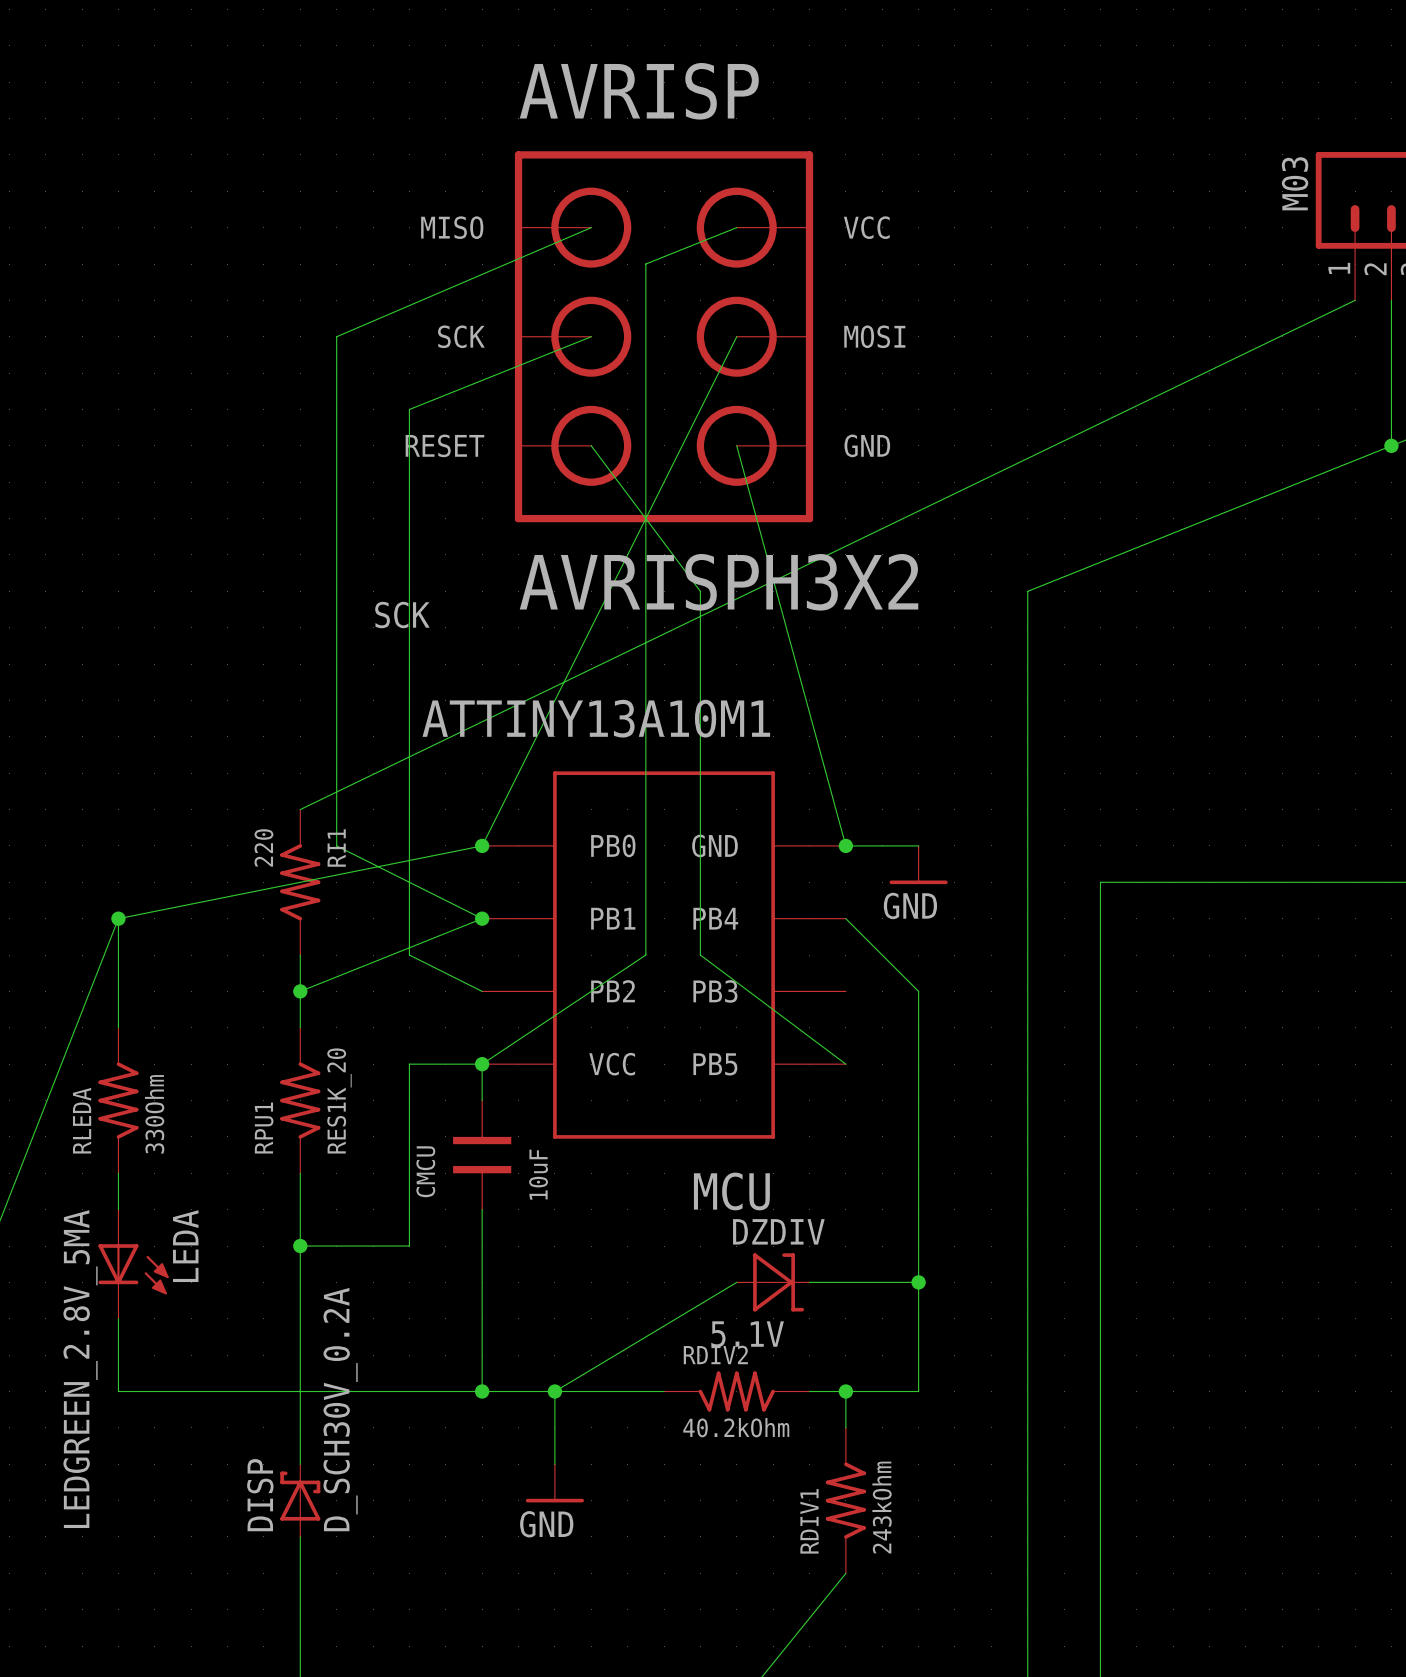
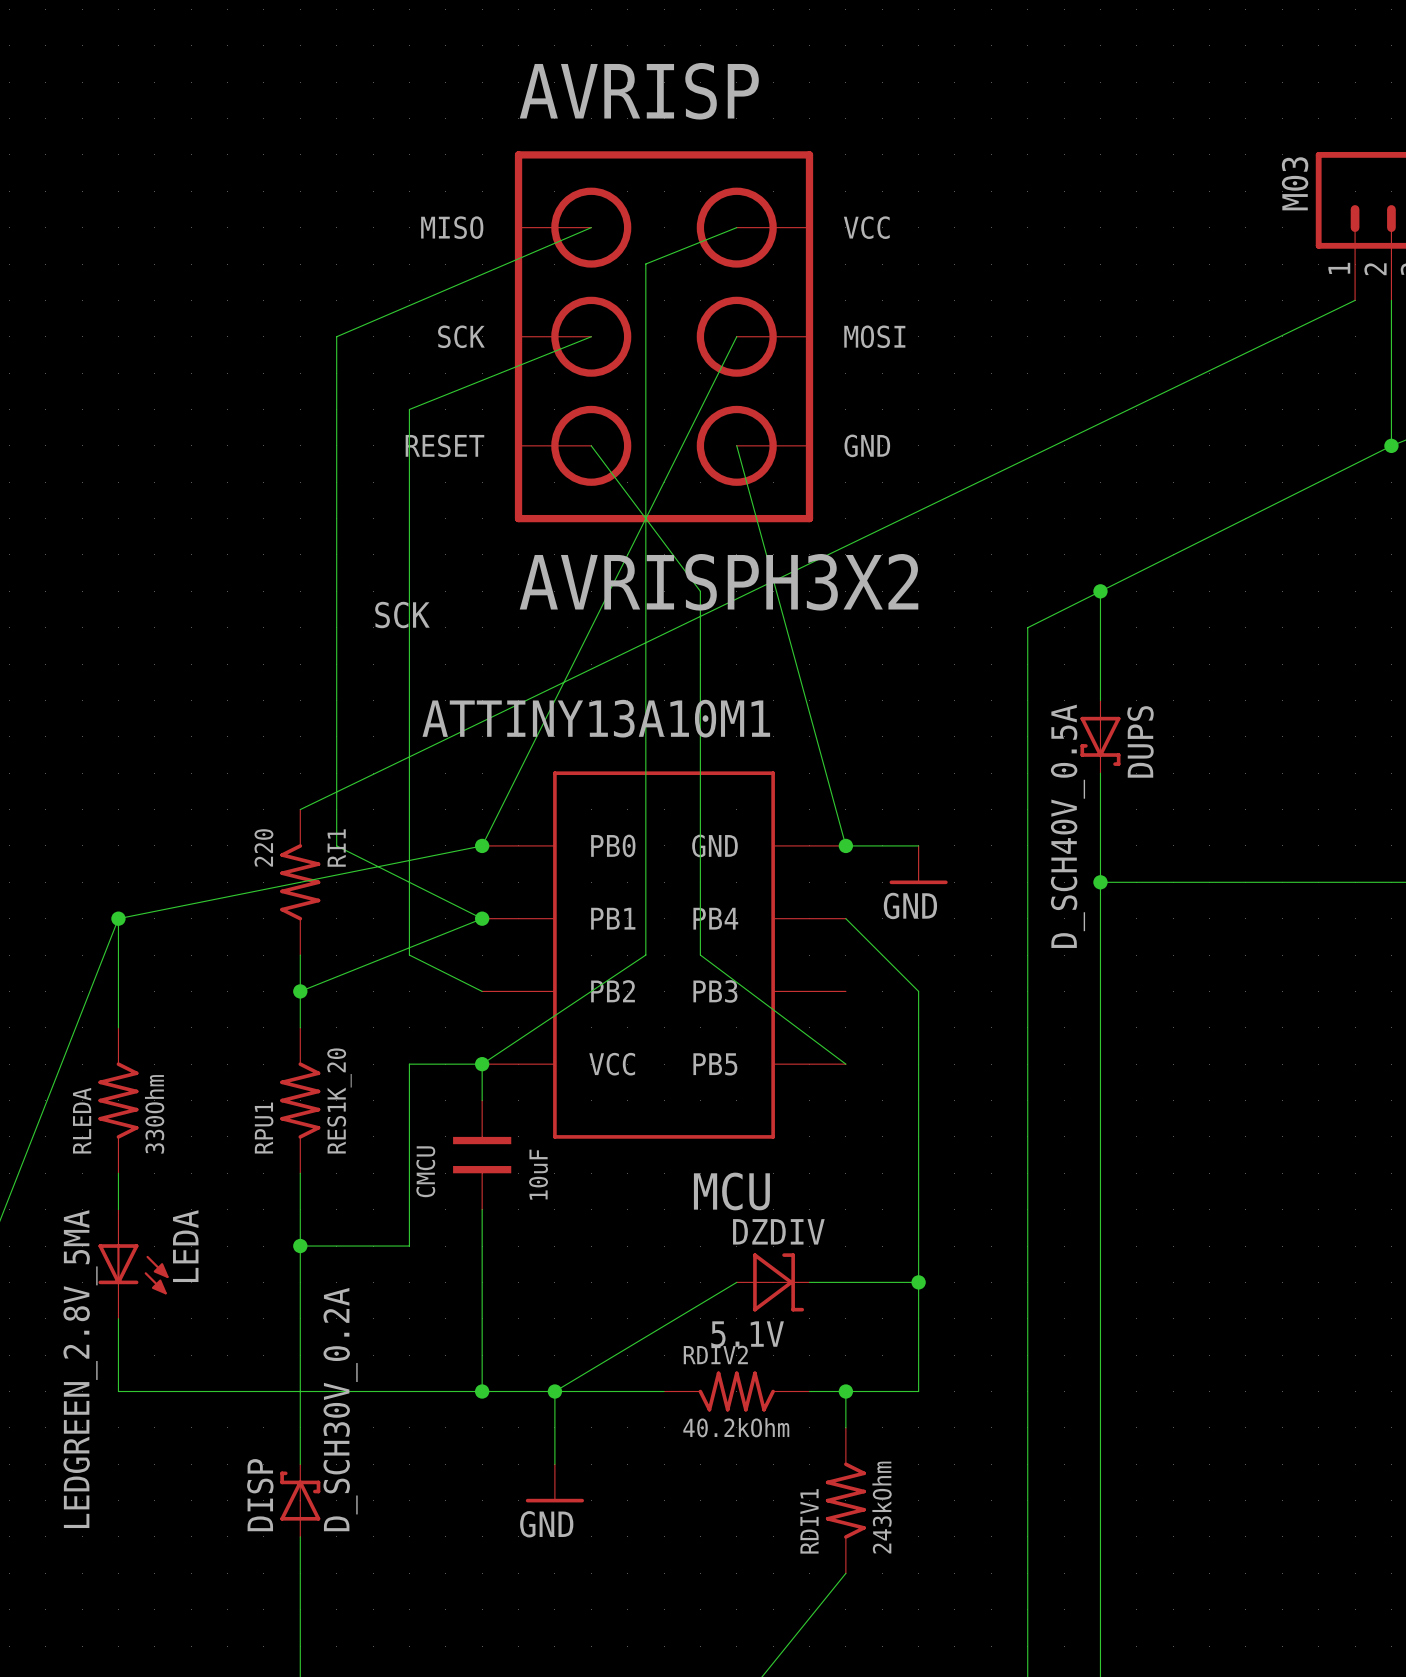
wire: (1391, 445) (1027, 591) (1027, 627) -> (1391, 445) (1027, 627)
wire: none -> (1100, 591) (1100, 700)
junction: none -> (1100, 591)
DUPS: none -> D_SCH40V_0.5A (1100, 736)
wire: none -> (1100, 773) (1100, 882)
junction: none -> (1100, 882)

